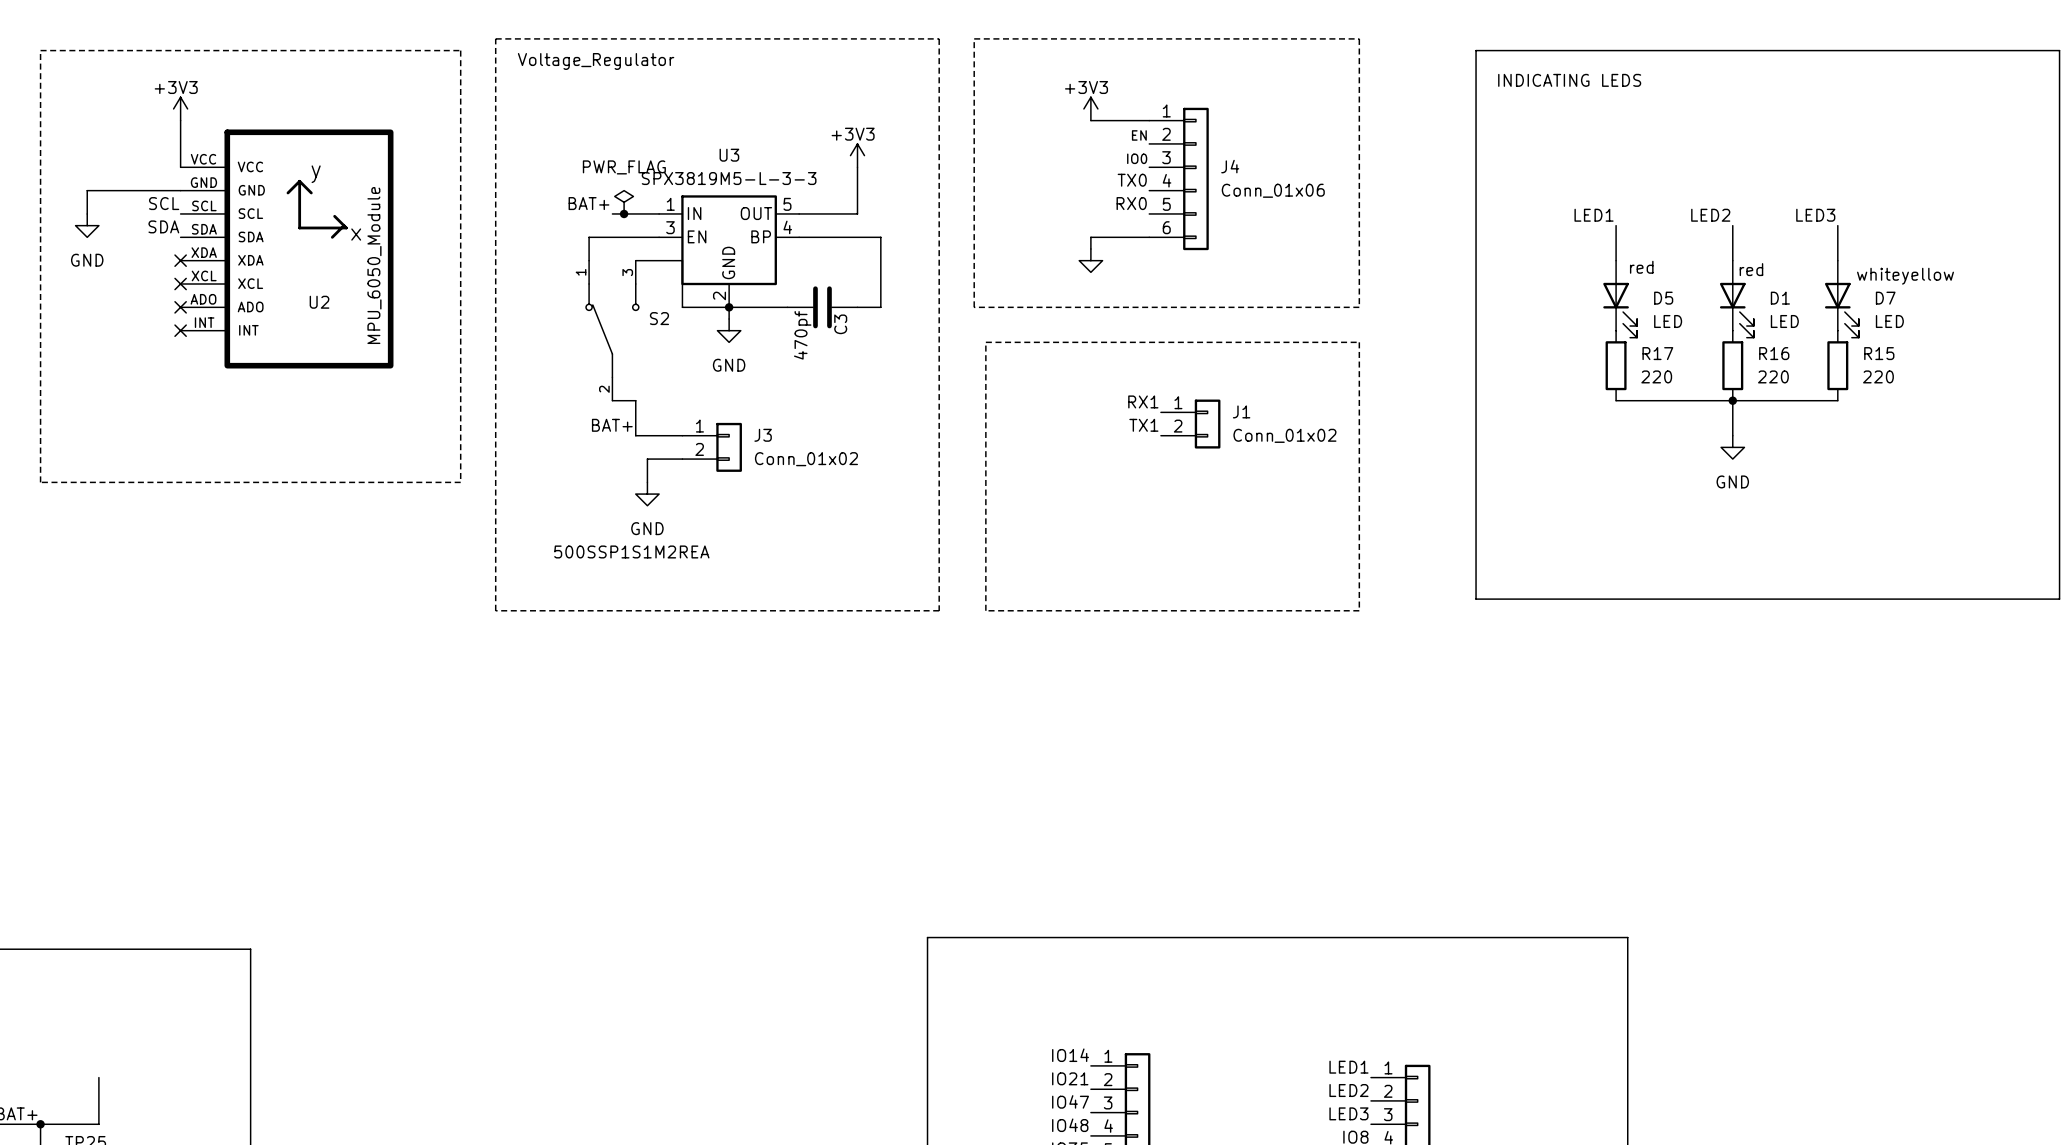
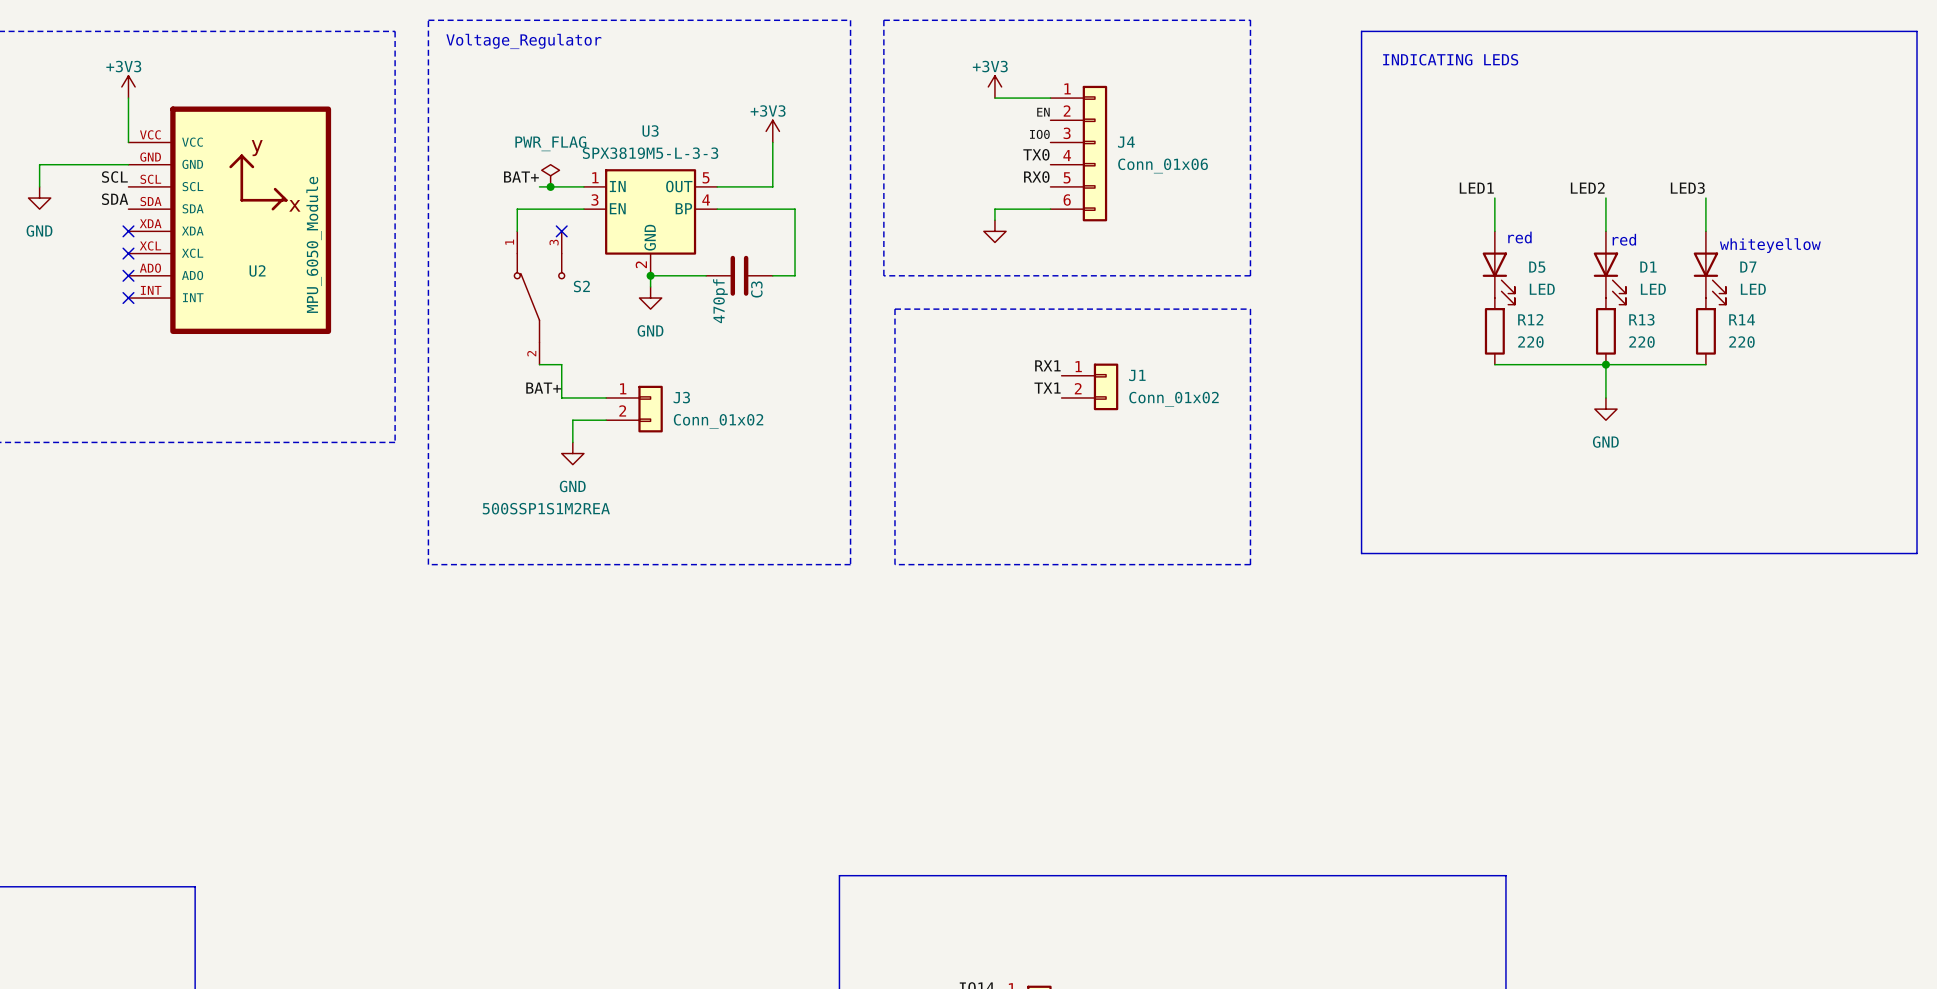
wire: (635, 260) (682, 260) (682, 307) (729, 307) -> none
no-connect mark: none -> (561, 231)
R17 name: R17 (1657, 353) -> R12 (1530, 319)
R16 name: R16 (1774, 353) -> R13 (1641, 319)
R15 name: R15 (1879, 353) -> R14 (1742, 319)

